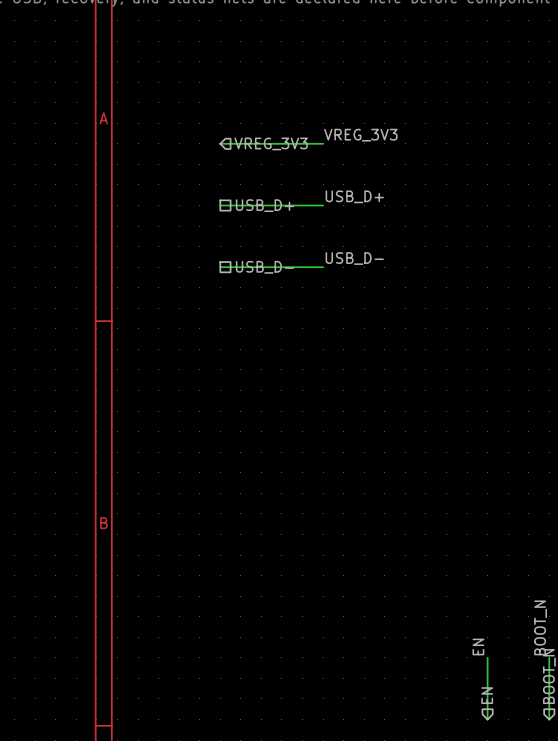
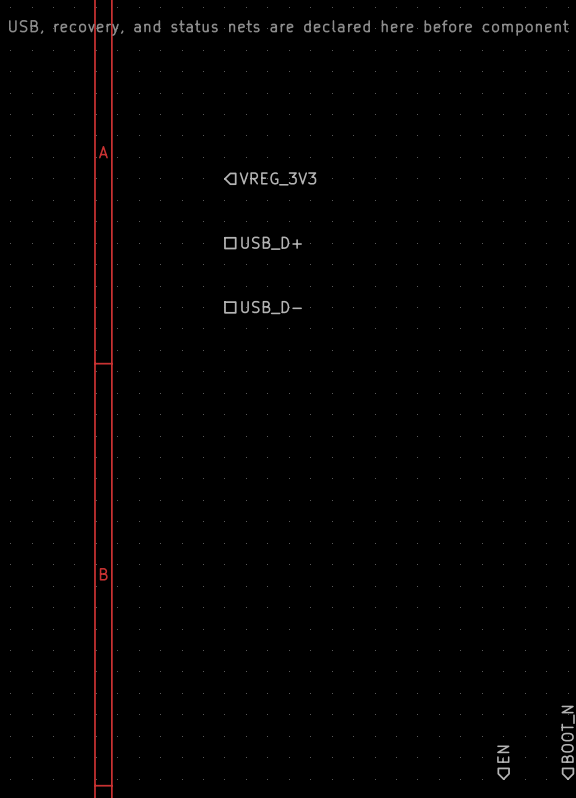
label: VREG_3V3 (360, 135) -> none
wire: (220, 143) (323, 143) -> none
label: USB_D+ (354, 196) -> none
wire: (220, 205) (323, 205) -> none
label: USB_D- (354, 258) -> none
wire: (220, 267) (323, 267) -> none
label: BOOT_N (540, 627) -> none
label: EN (478, 646) -> none
wire: (487, 657) (487, 719) -> none
wire: (549, 657) (549, 719) -> none

